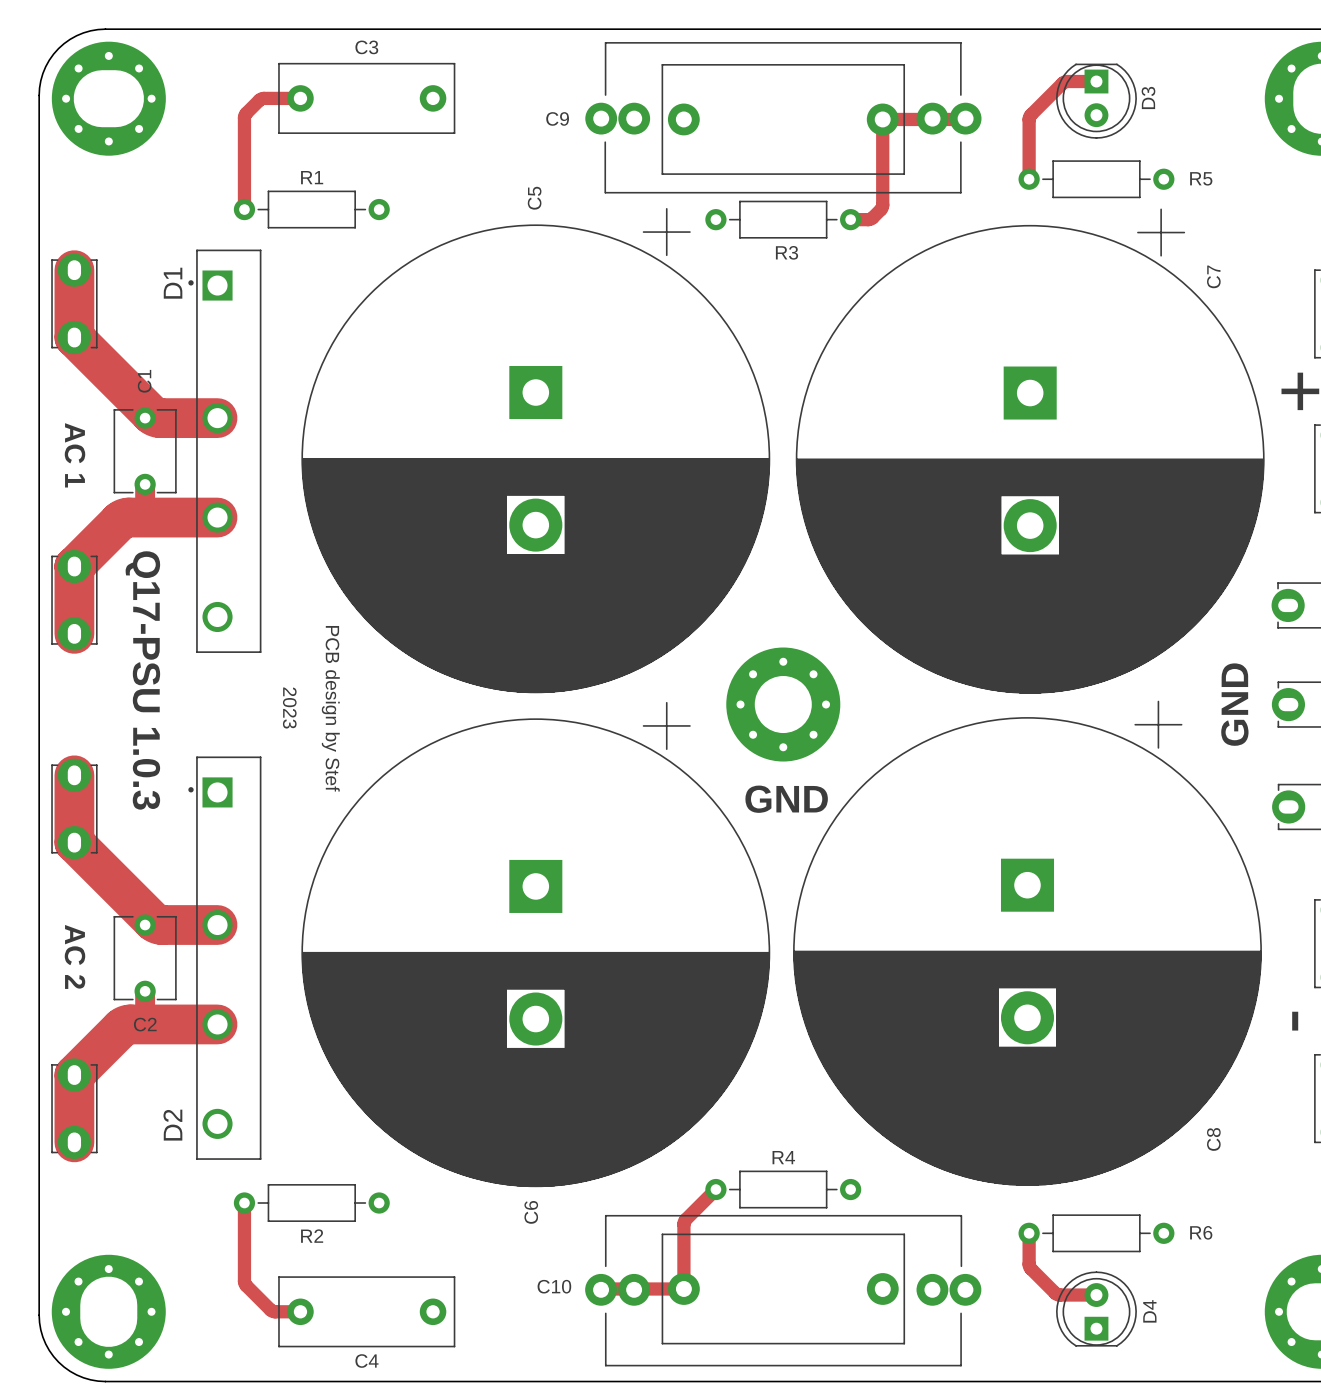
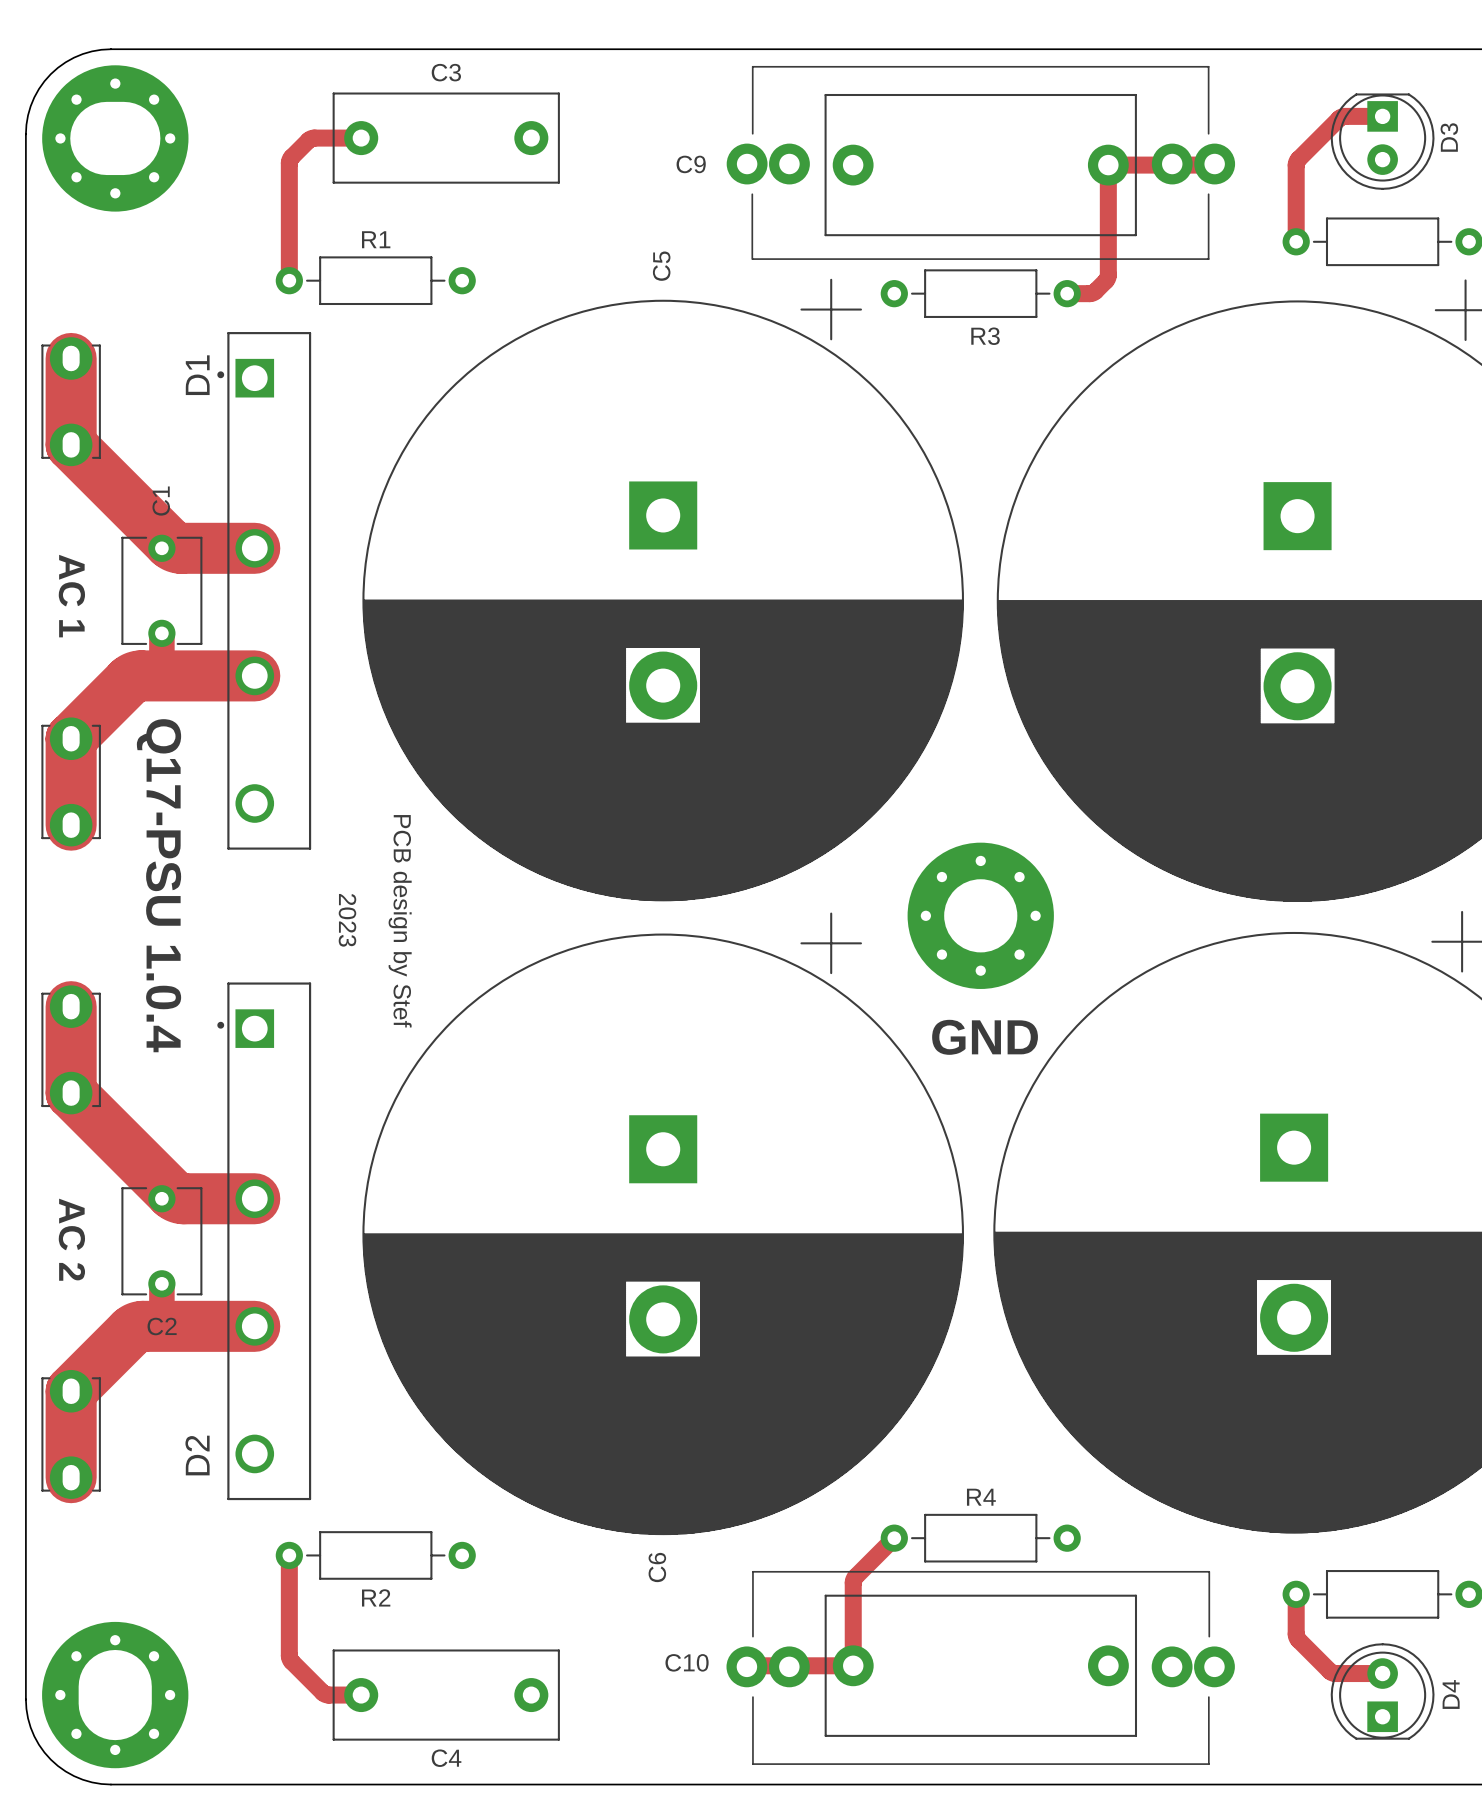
text: Q17-PSU 1.0.3 (142, 680) -> Q17-PSU 1.0.4 (158, 885)

